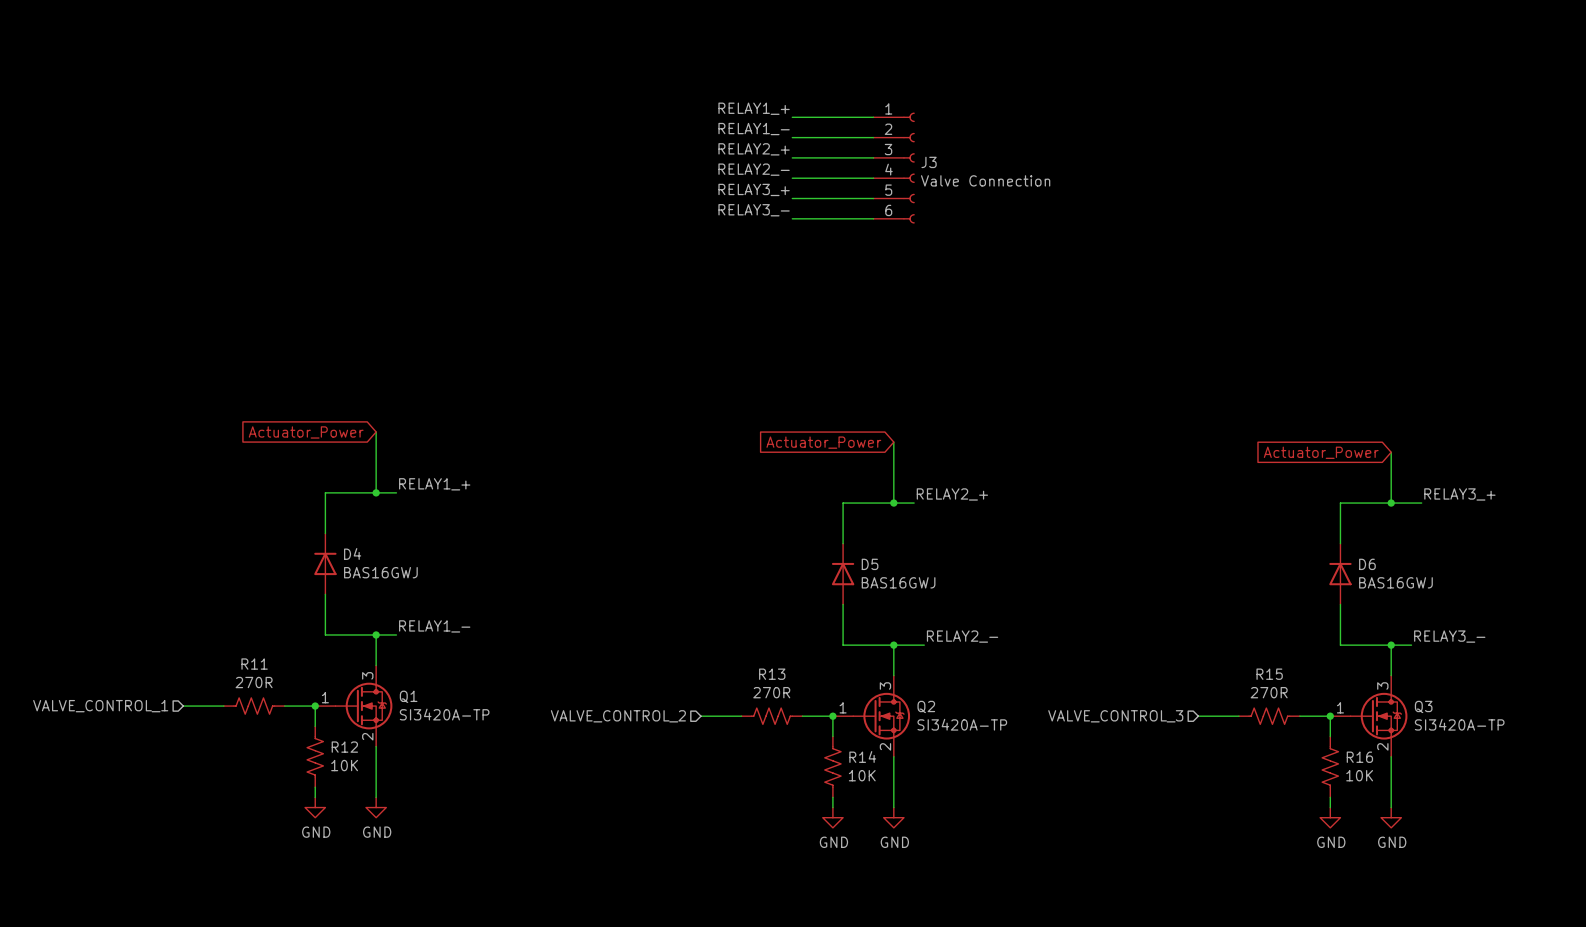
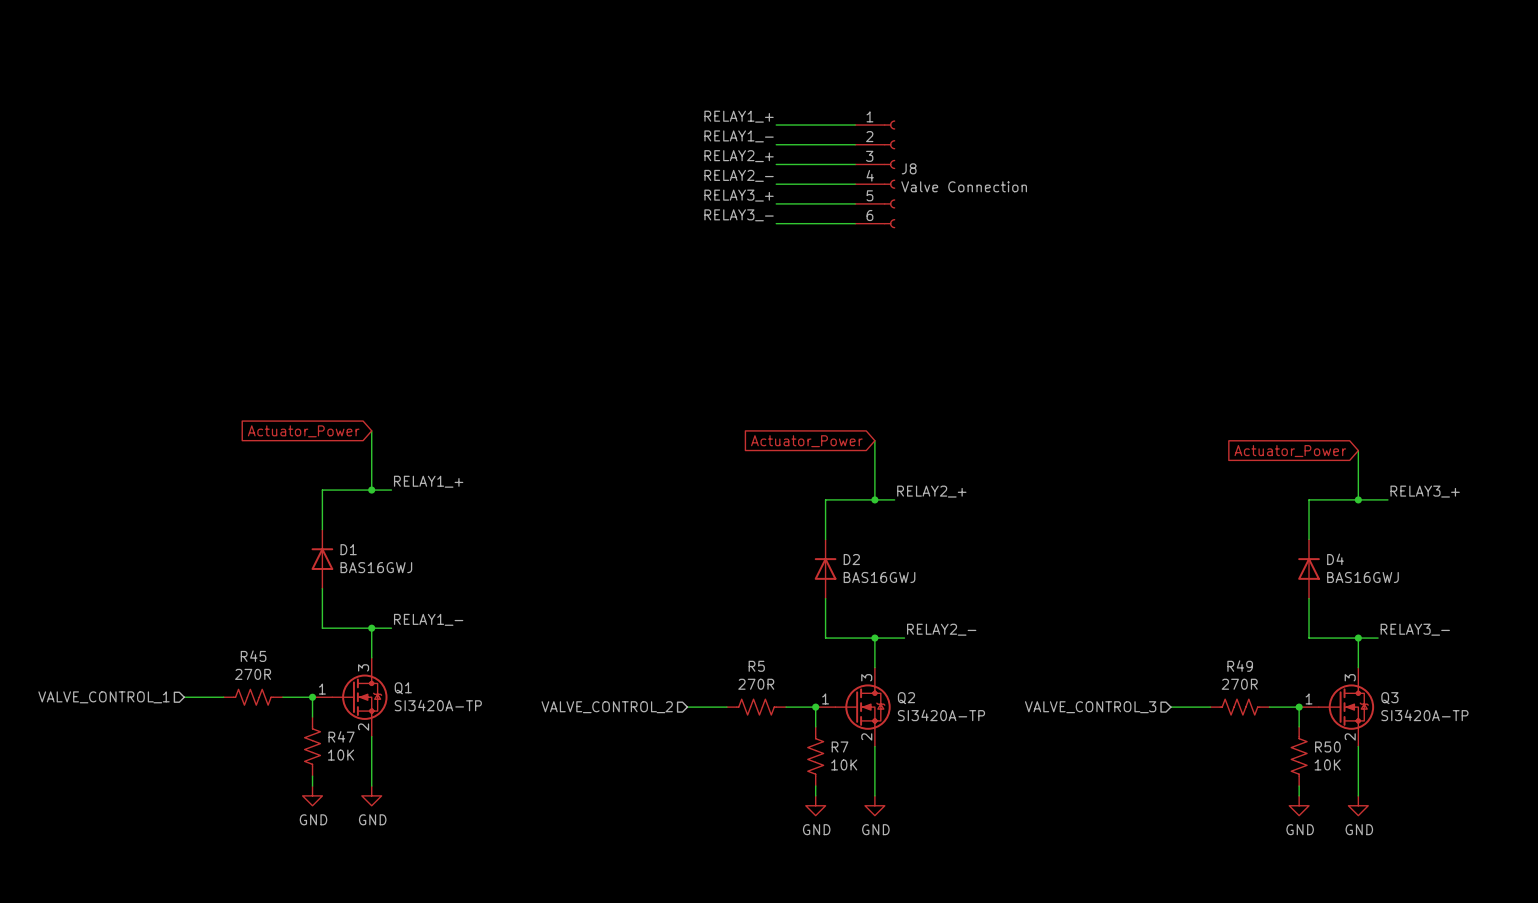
J3 name: J3 (929, 162) -> J8 (909, 168)
D4 name: D4 (352, 553) -> D1 (348, 549)
D5 name: D5 (870, 564) -> D2 (851, 559)
D6 name: D6 (1367, 564) -> D4 (1335, 559)
R11 name: R11 (254, 664) -> R45 (253, 656)
R13 name: R13 (772, 674) -> R5 (756, 666)
R15 name: R15 (1269, 674) -> R49 (1240, 666)
R12 name: R12 (344, 747) -> R47 (341, 736)
R14 name: R14 (862, 756) -> R7 (840, 746)
R16 name: R16 (1359, 757) -> R50 (1327, 746)

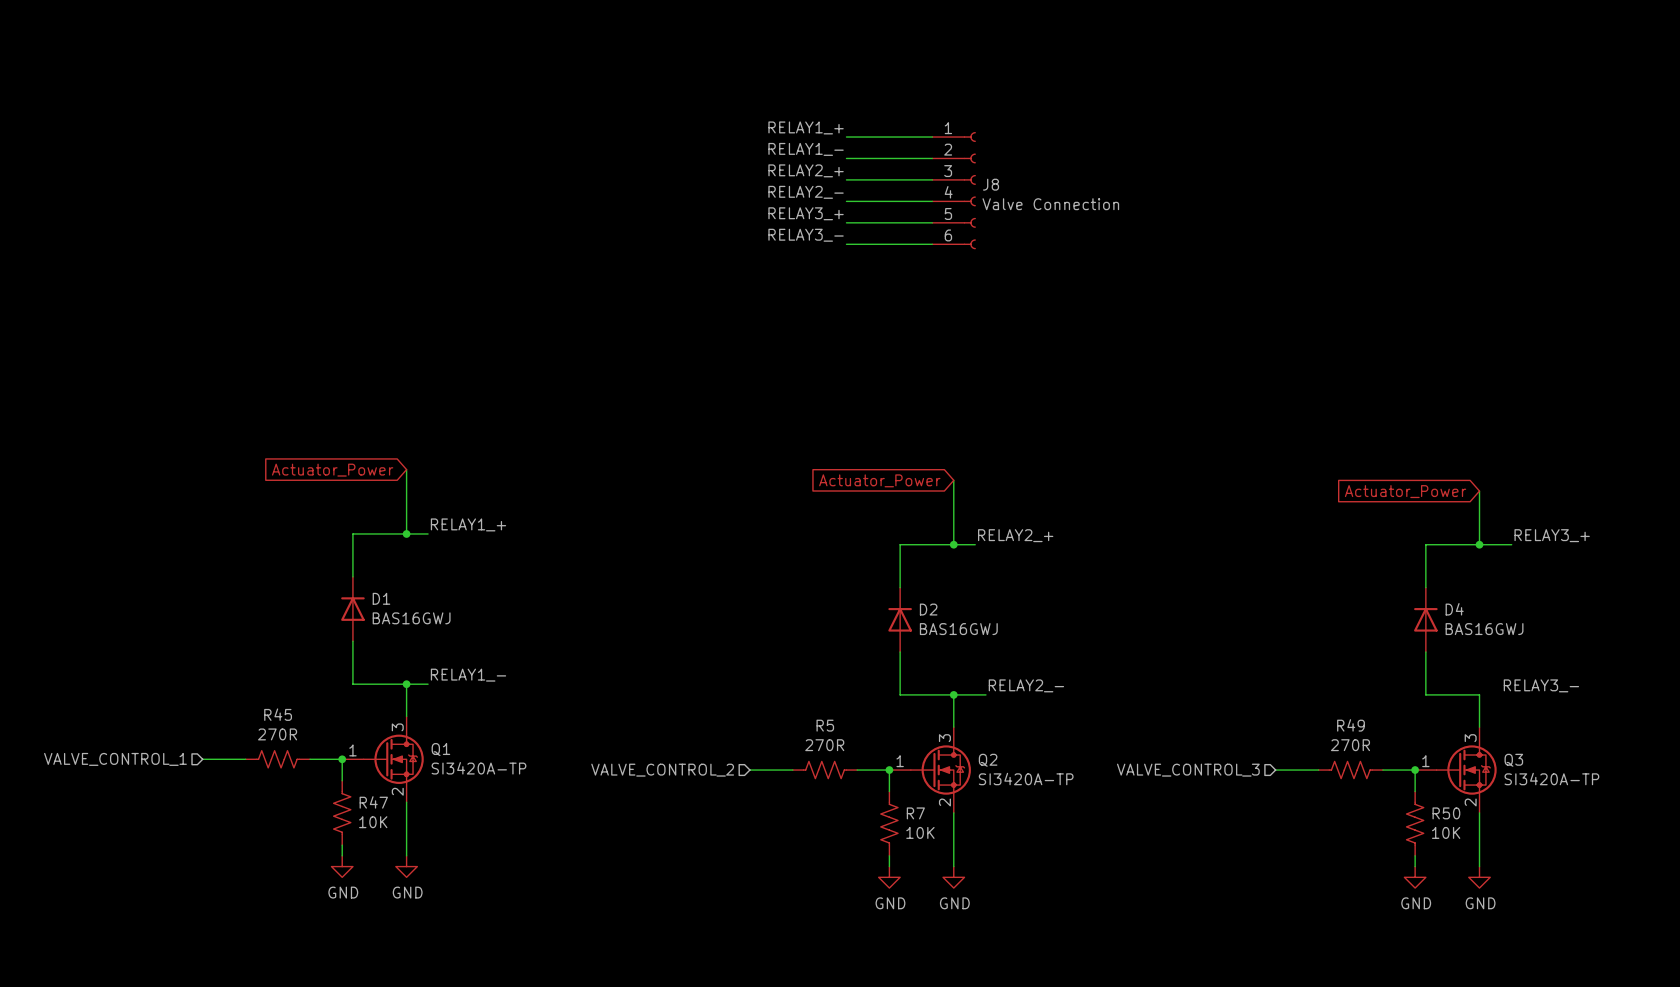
wire: (1358, 638) (1378, 638) -> none
junction: (1358, 638) -> none

